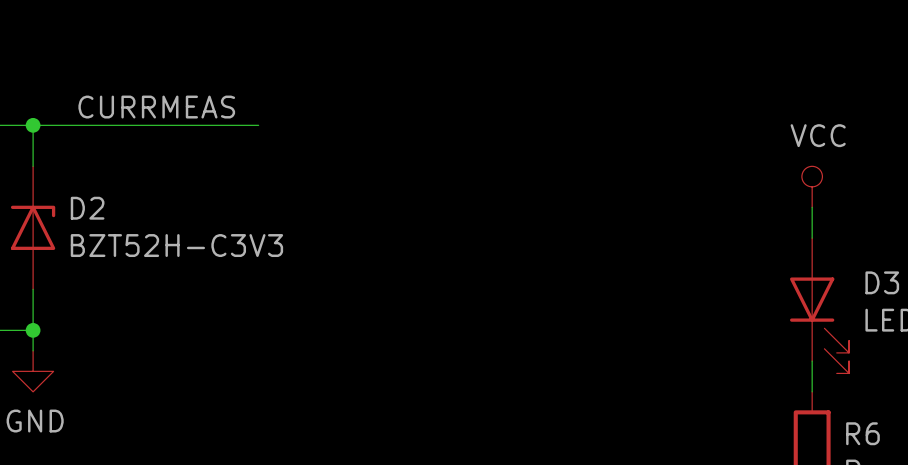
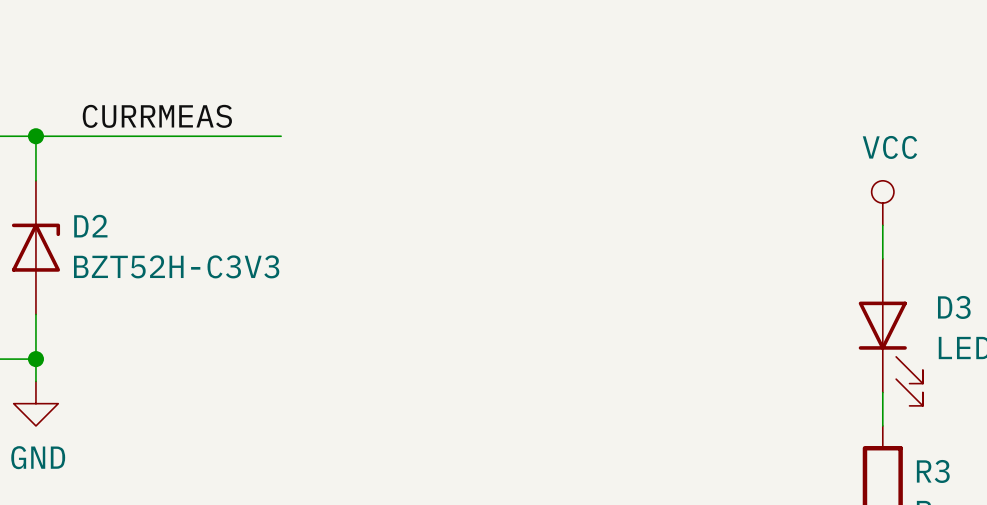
R6 name: R6 (862, 433) -> R3 (933, 471)

